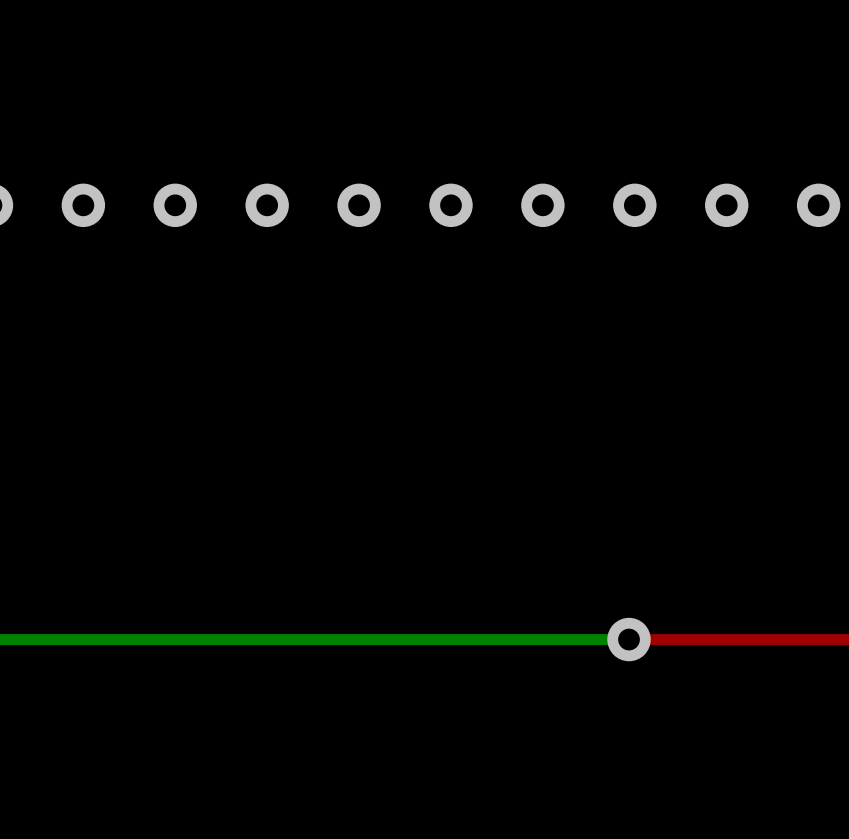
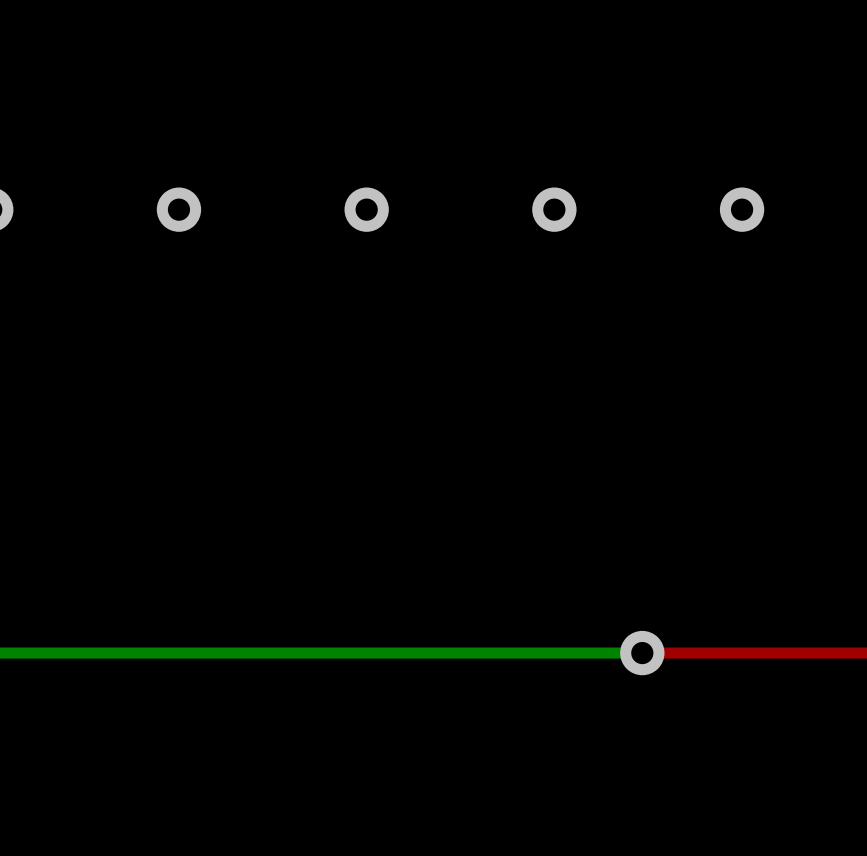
via: (83, 205) -> none
via: (267, 205) -> none
via: (450, 205) -> none
via: (634, 205) -> none
via: (818, 205) -> none

